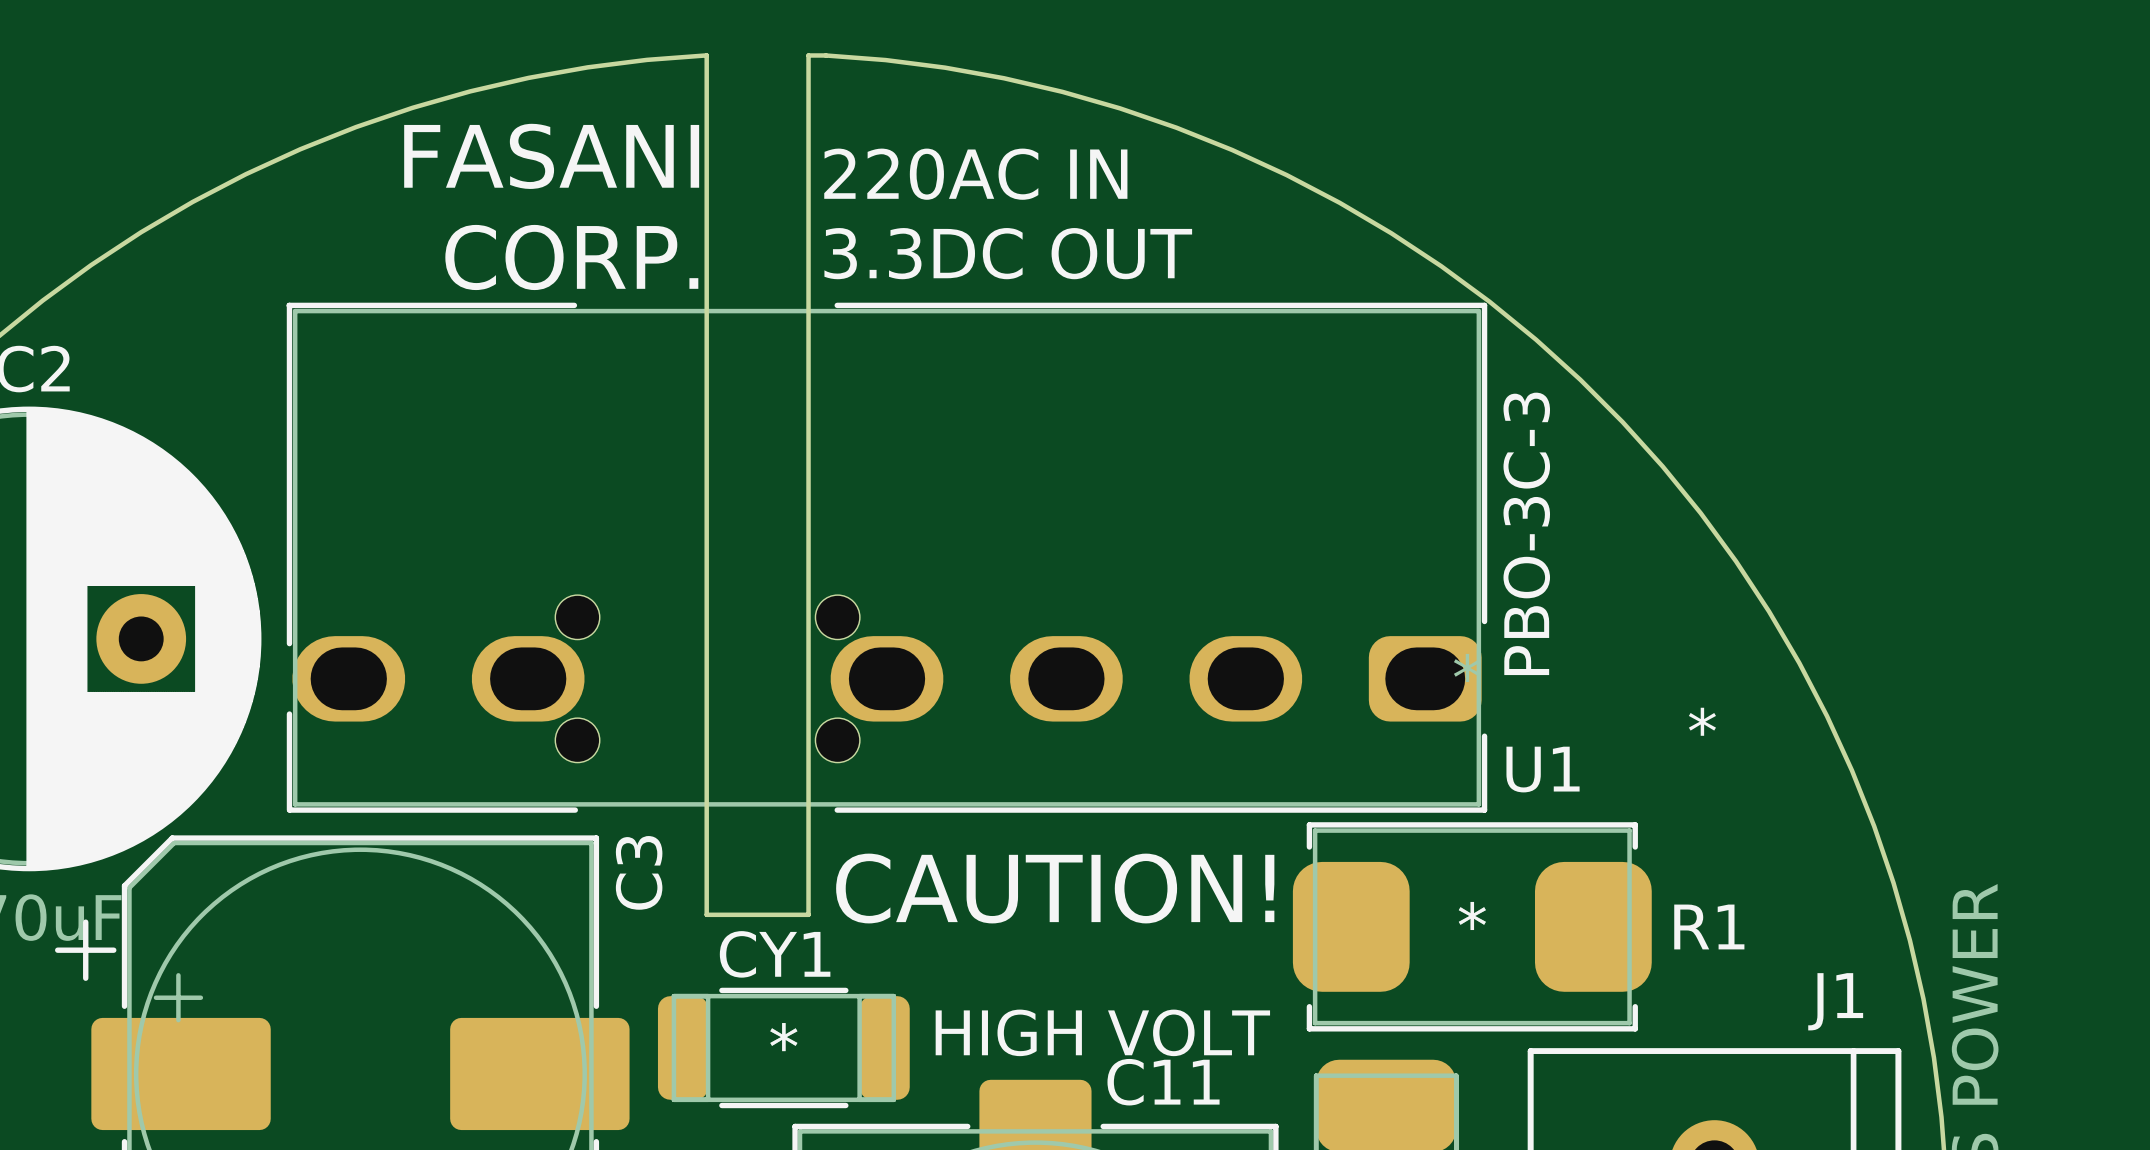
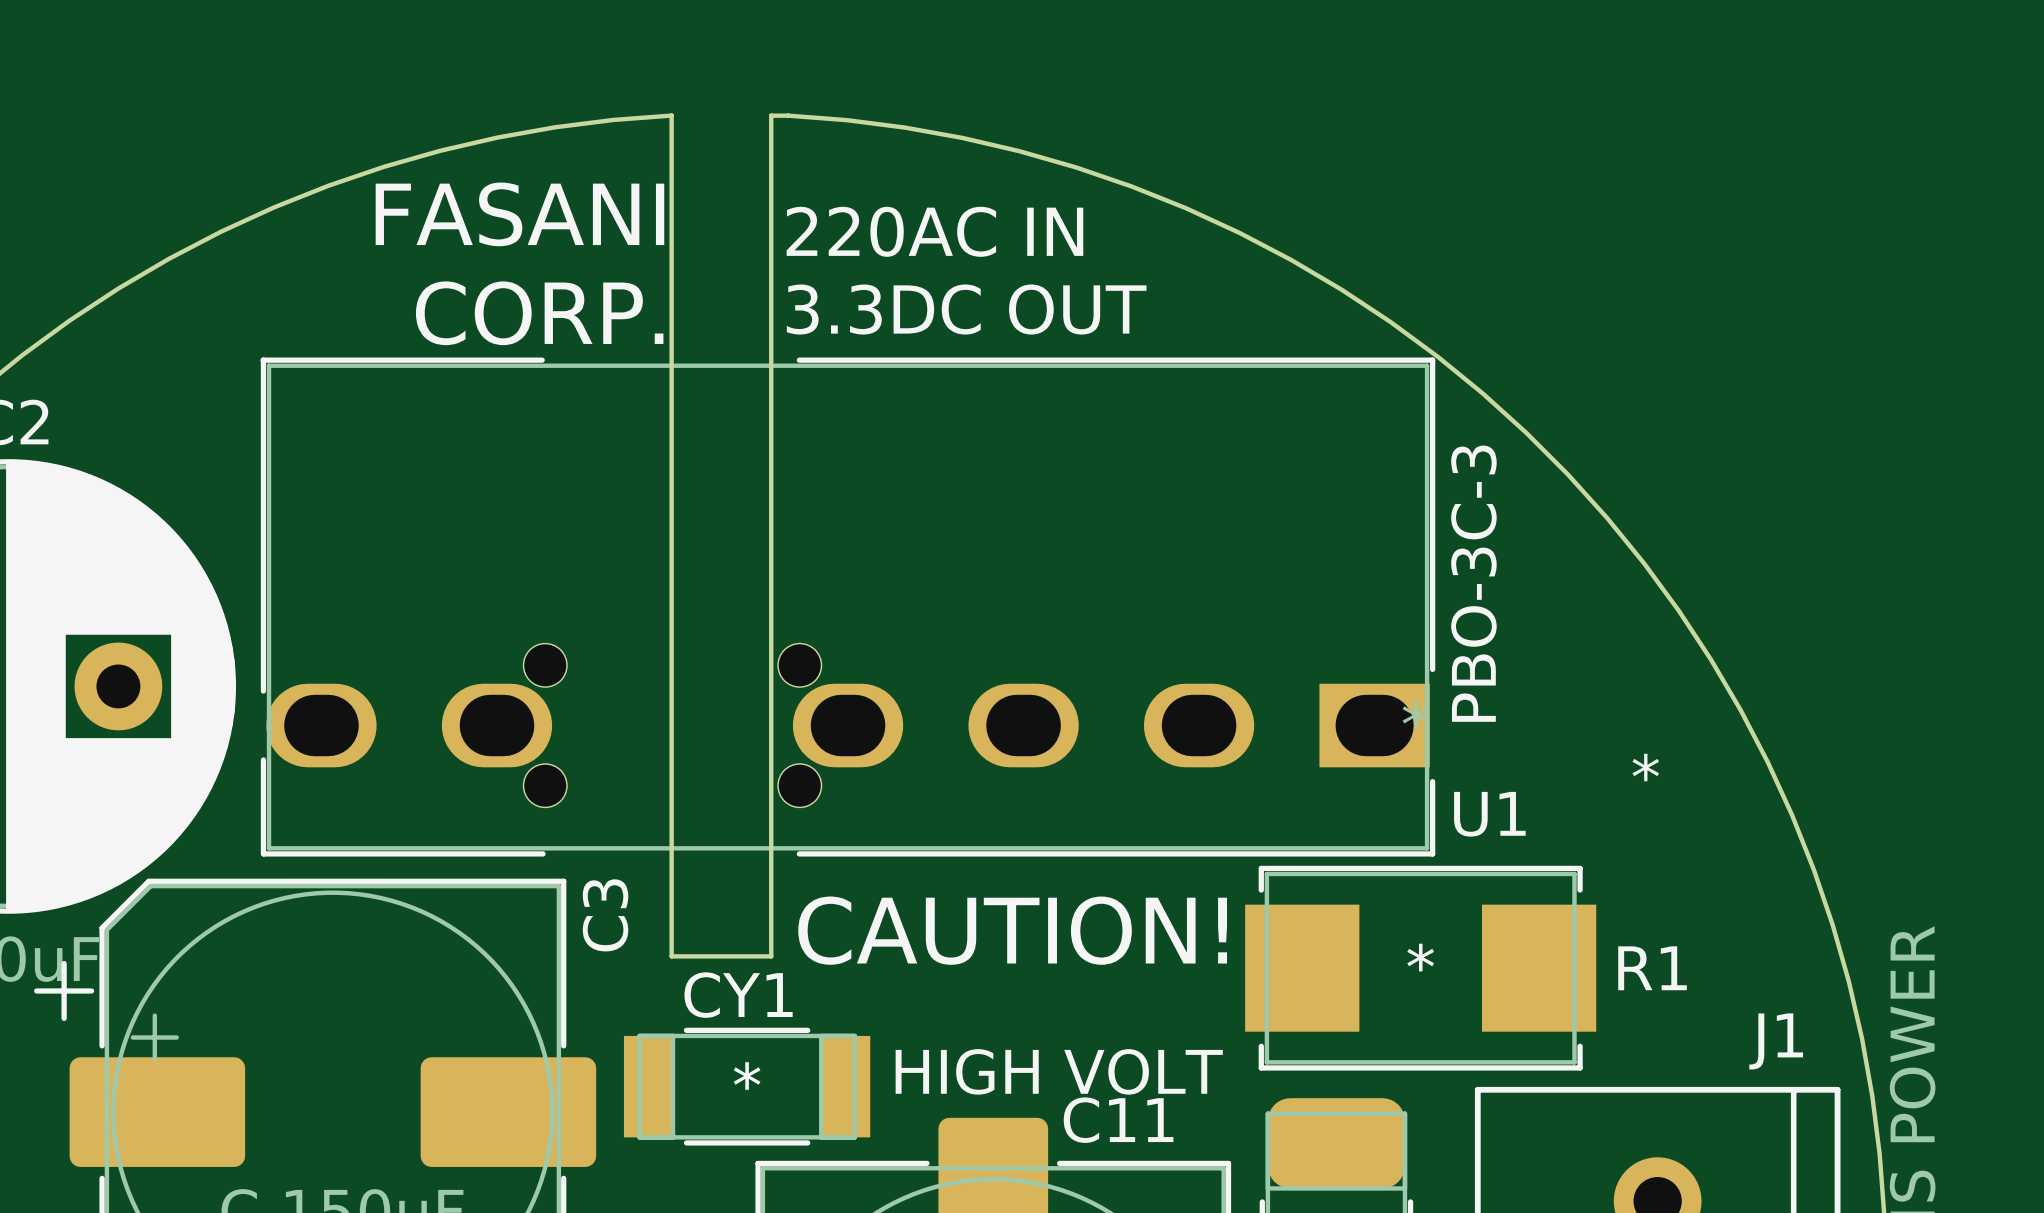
U1 footprint: [286, 302, 1488, 813] -> [260, 357, 1436, 857]
R1 footprint: [1292, 822, 1652, 1032] -> [1245, 865, 1597, 1071]
CY1 footprint: [657, 987, 910, 1109] -> [623, 1027, 871, 1146]

